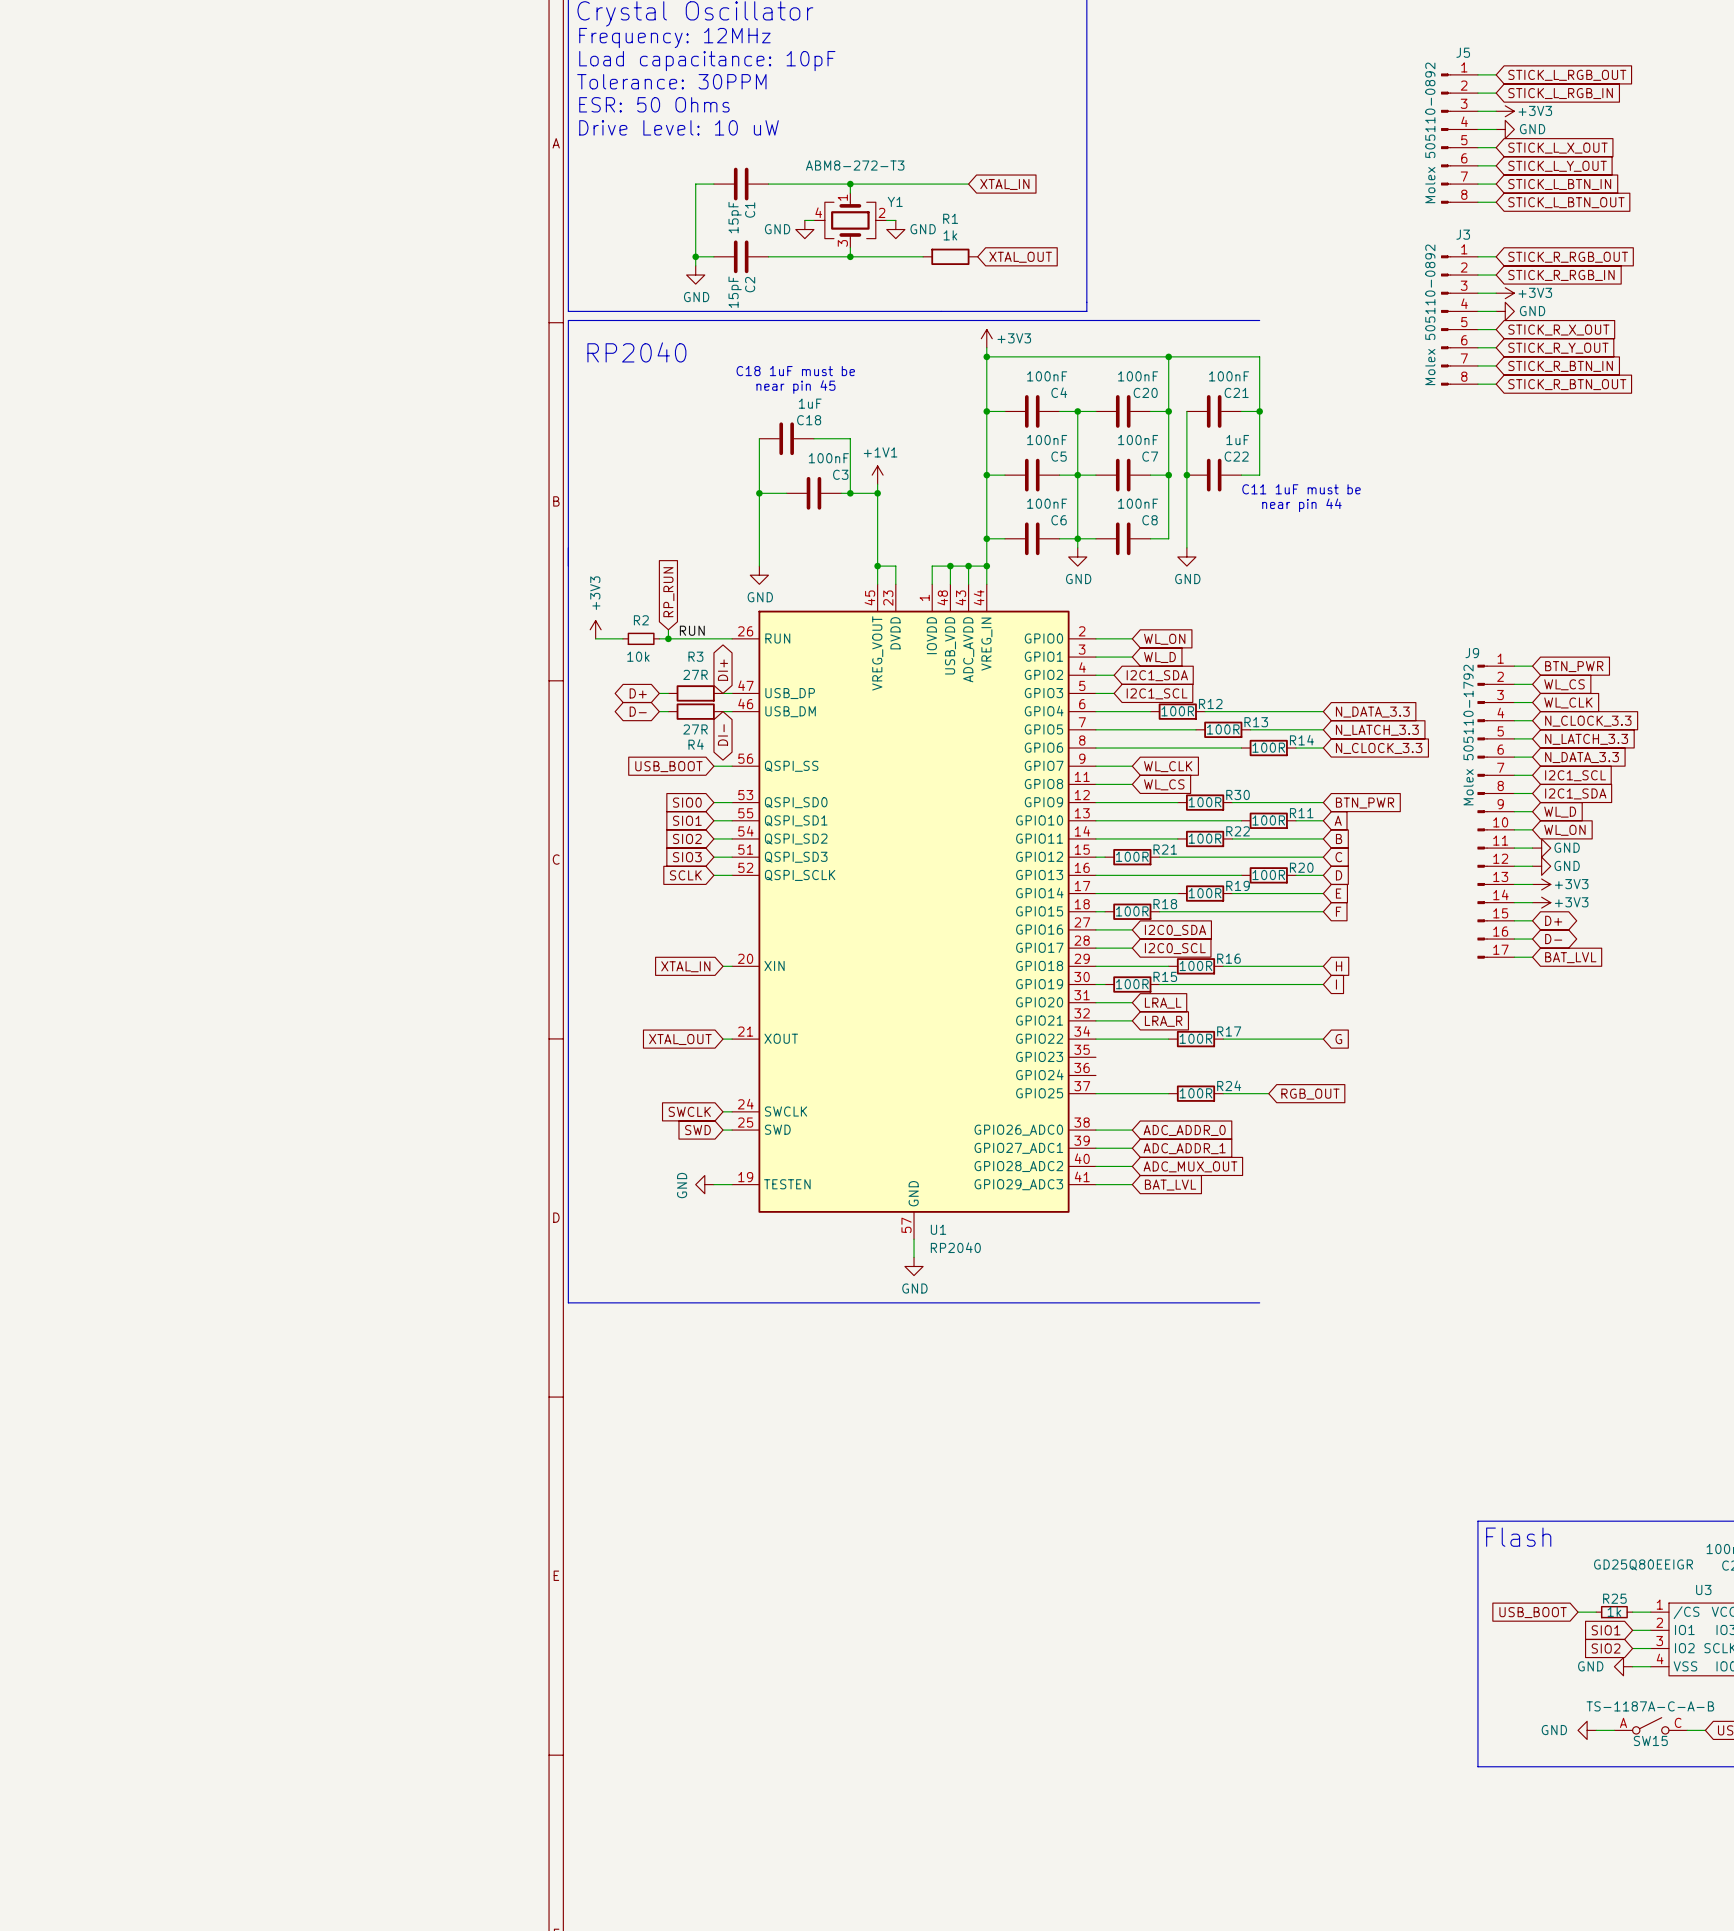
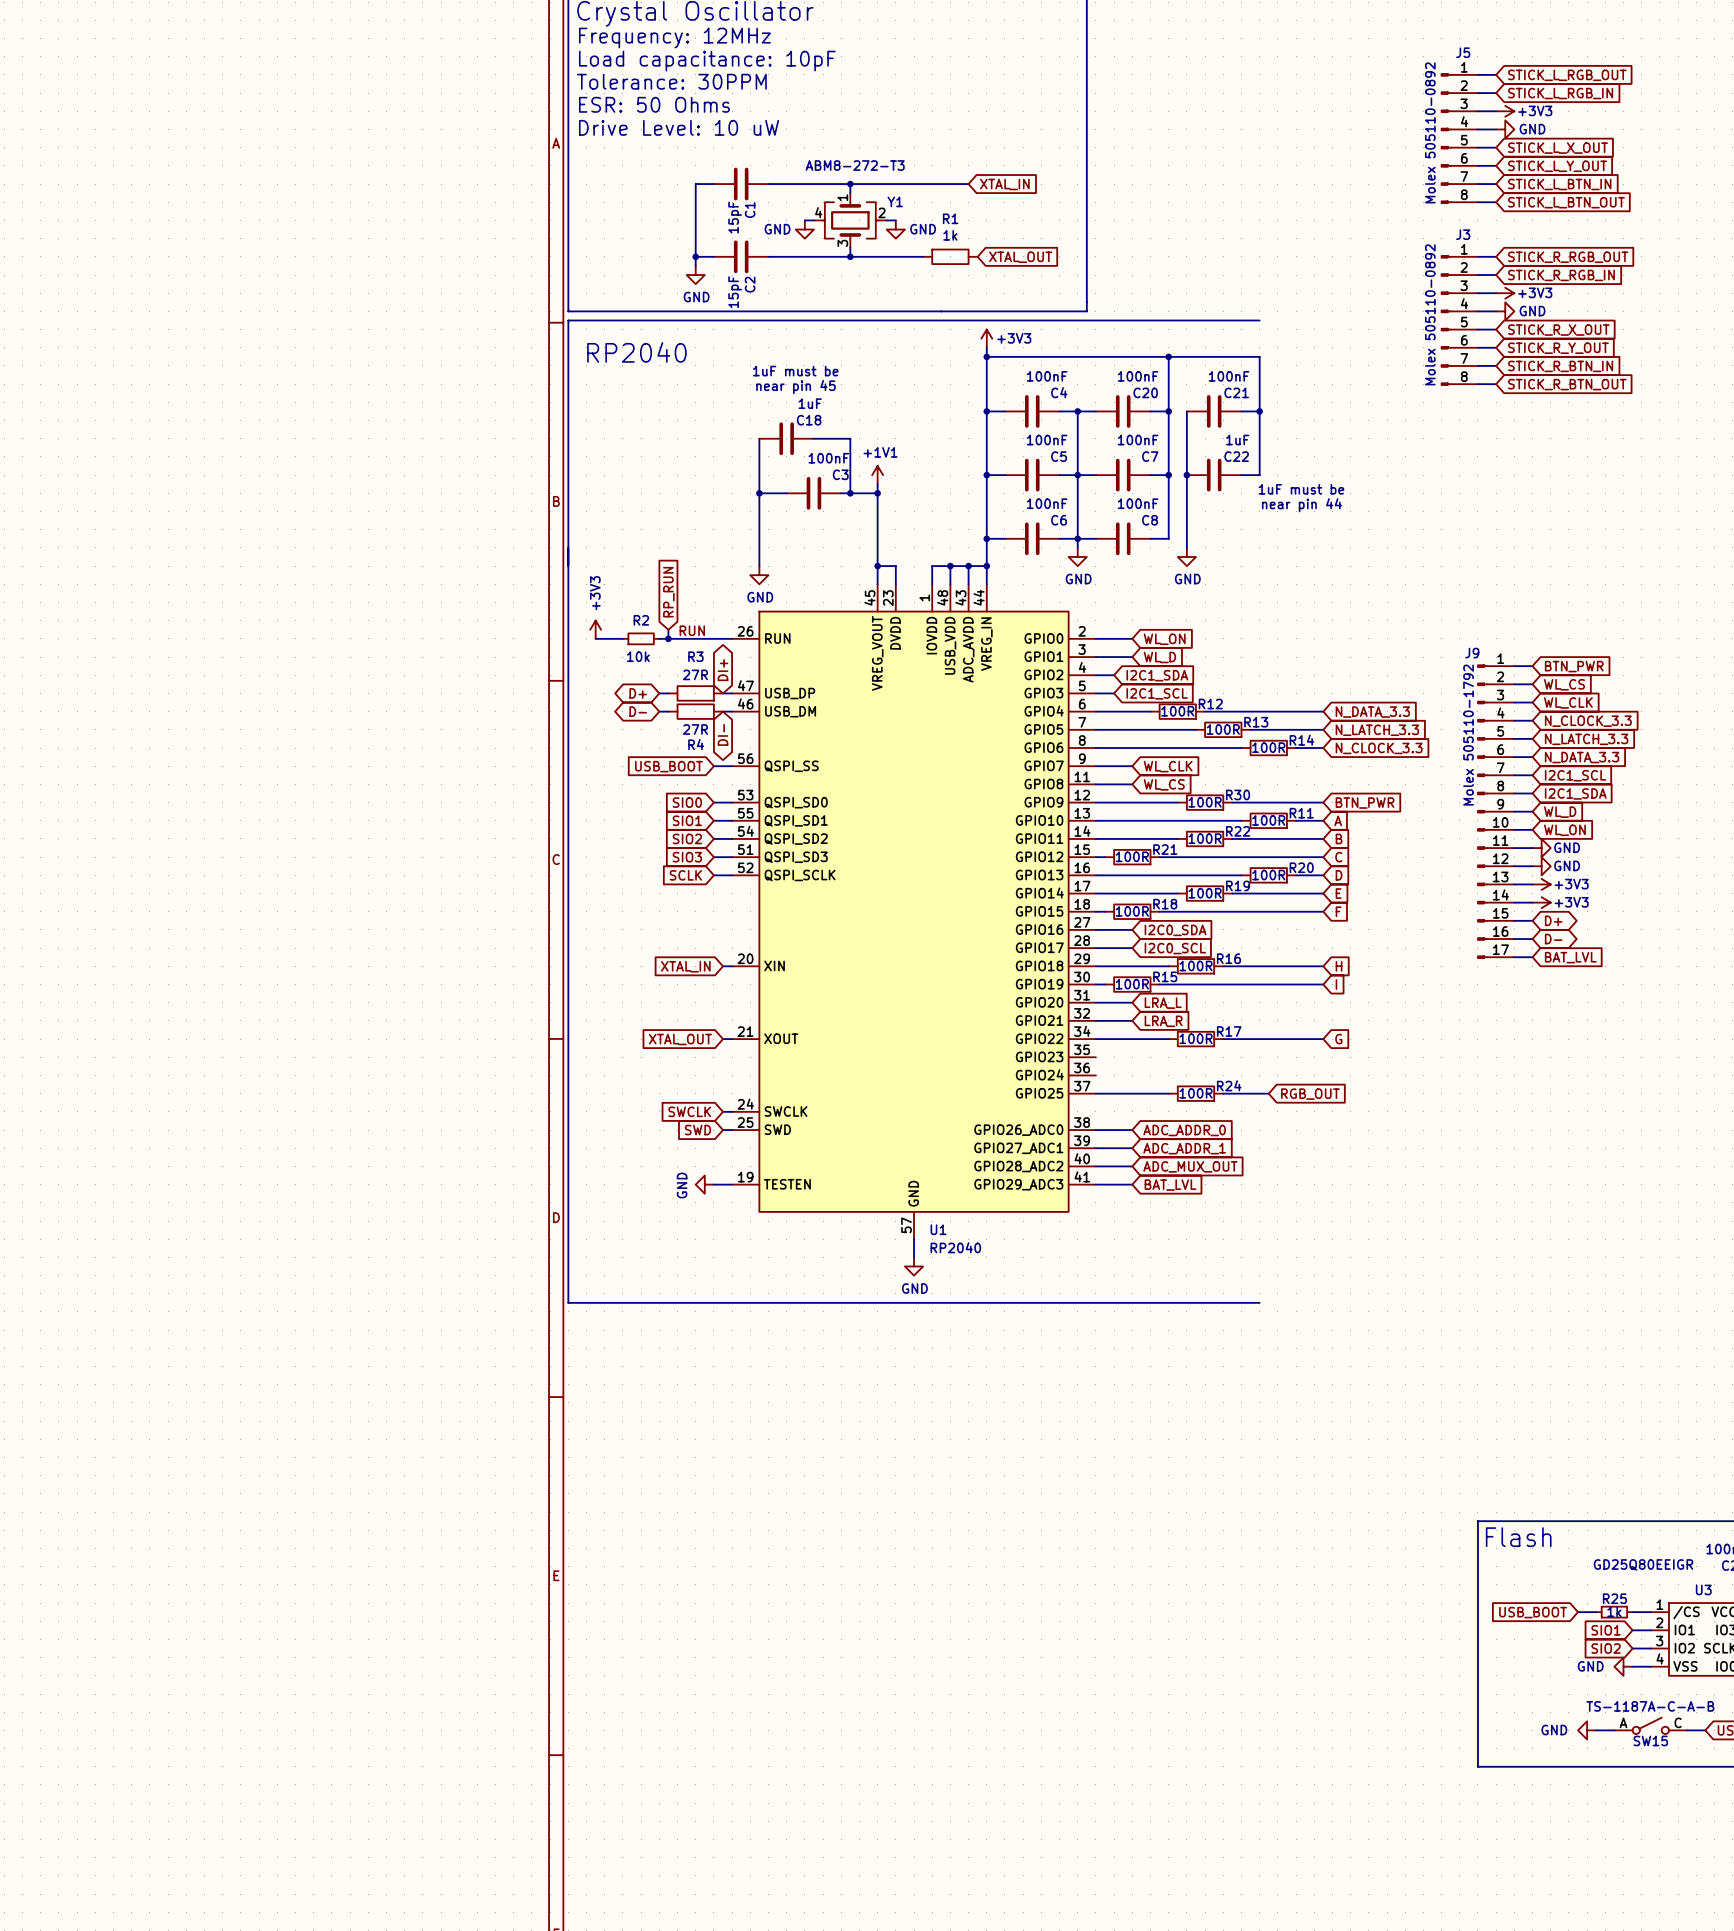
text: C18 1uF must be (795, 371) -> 1uF must be (795, 371)
text: C11 1uF must be (1301, 489) -> 1uF must be (1301, 489)

